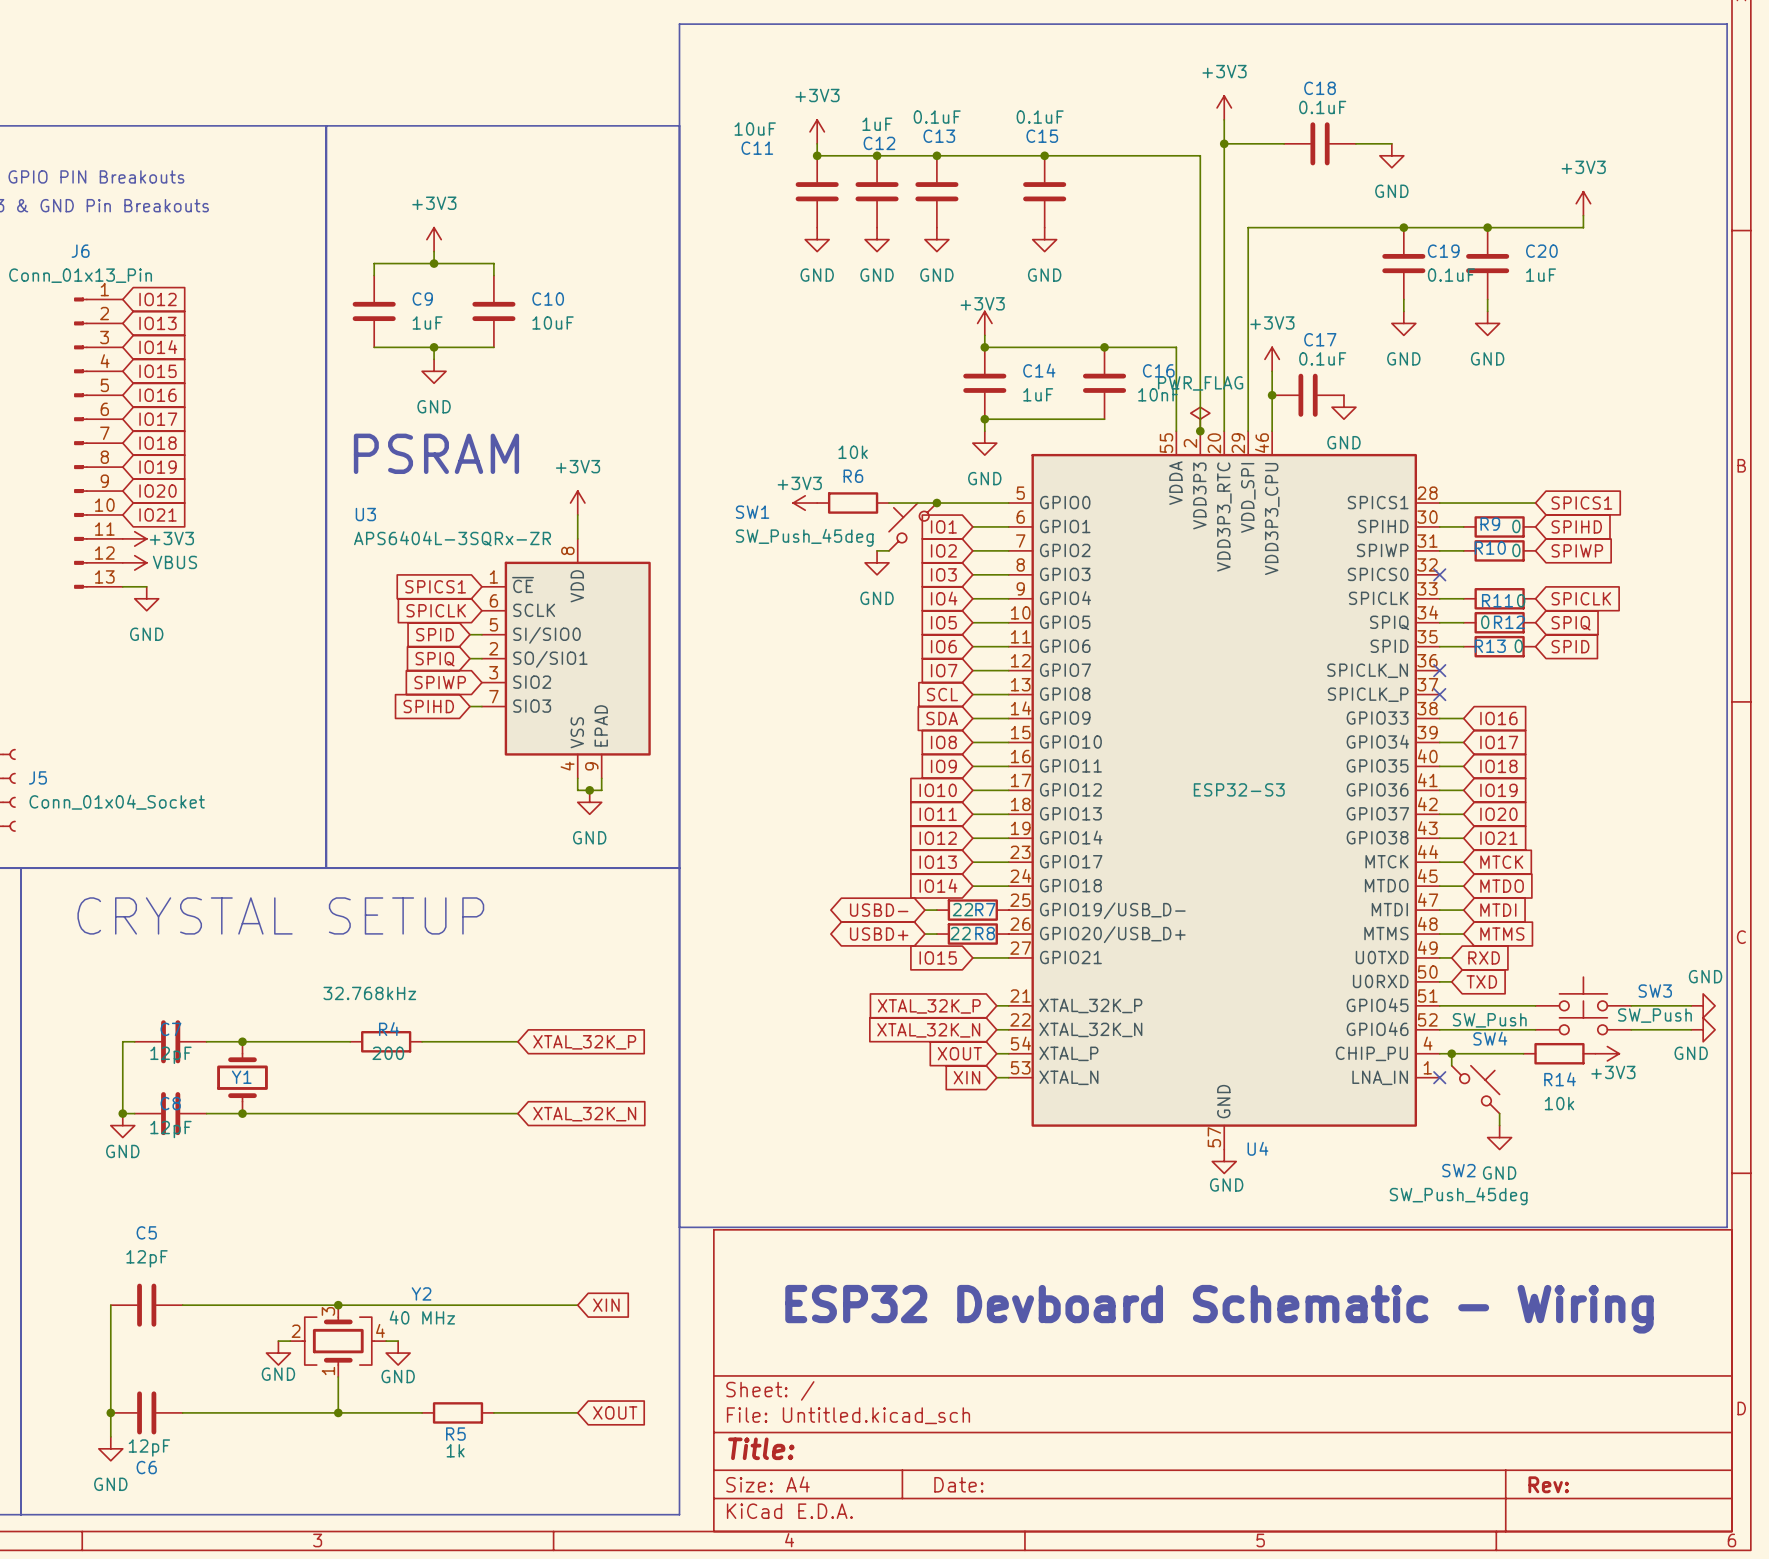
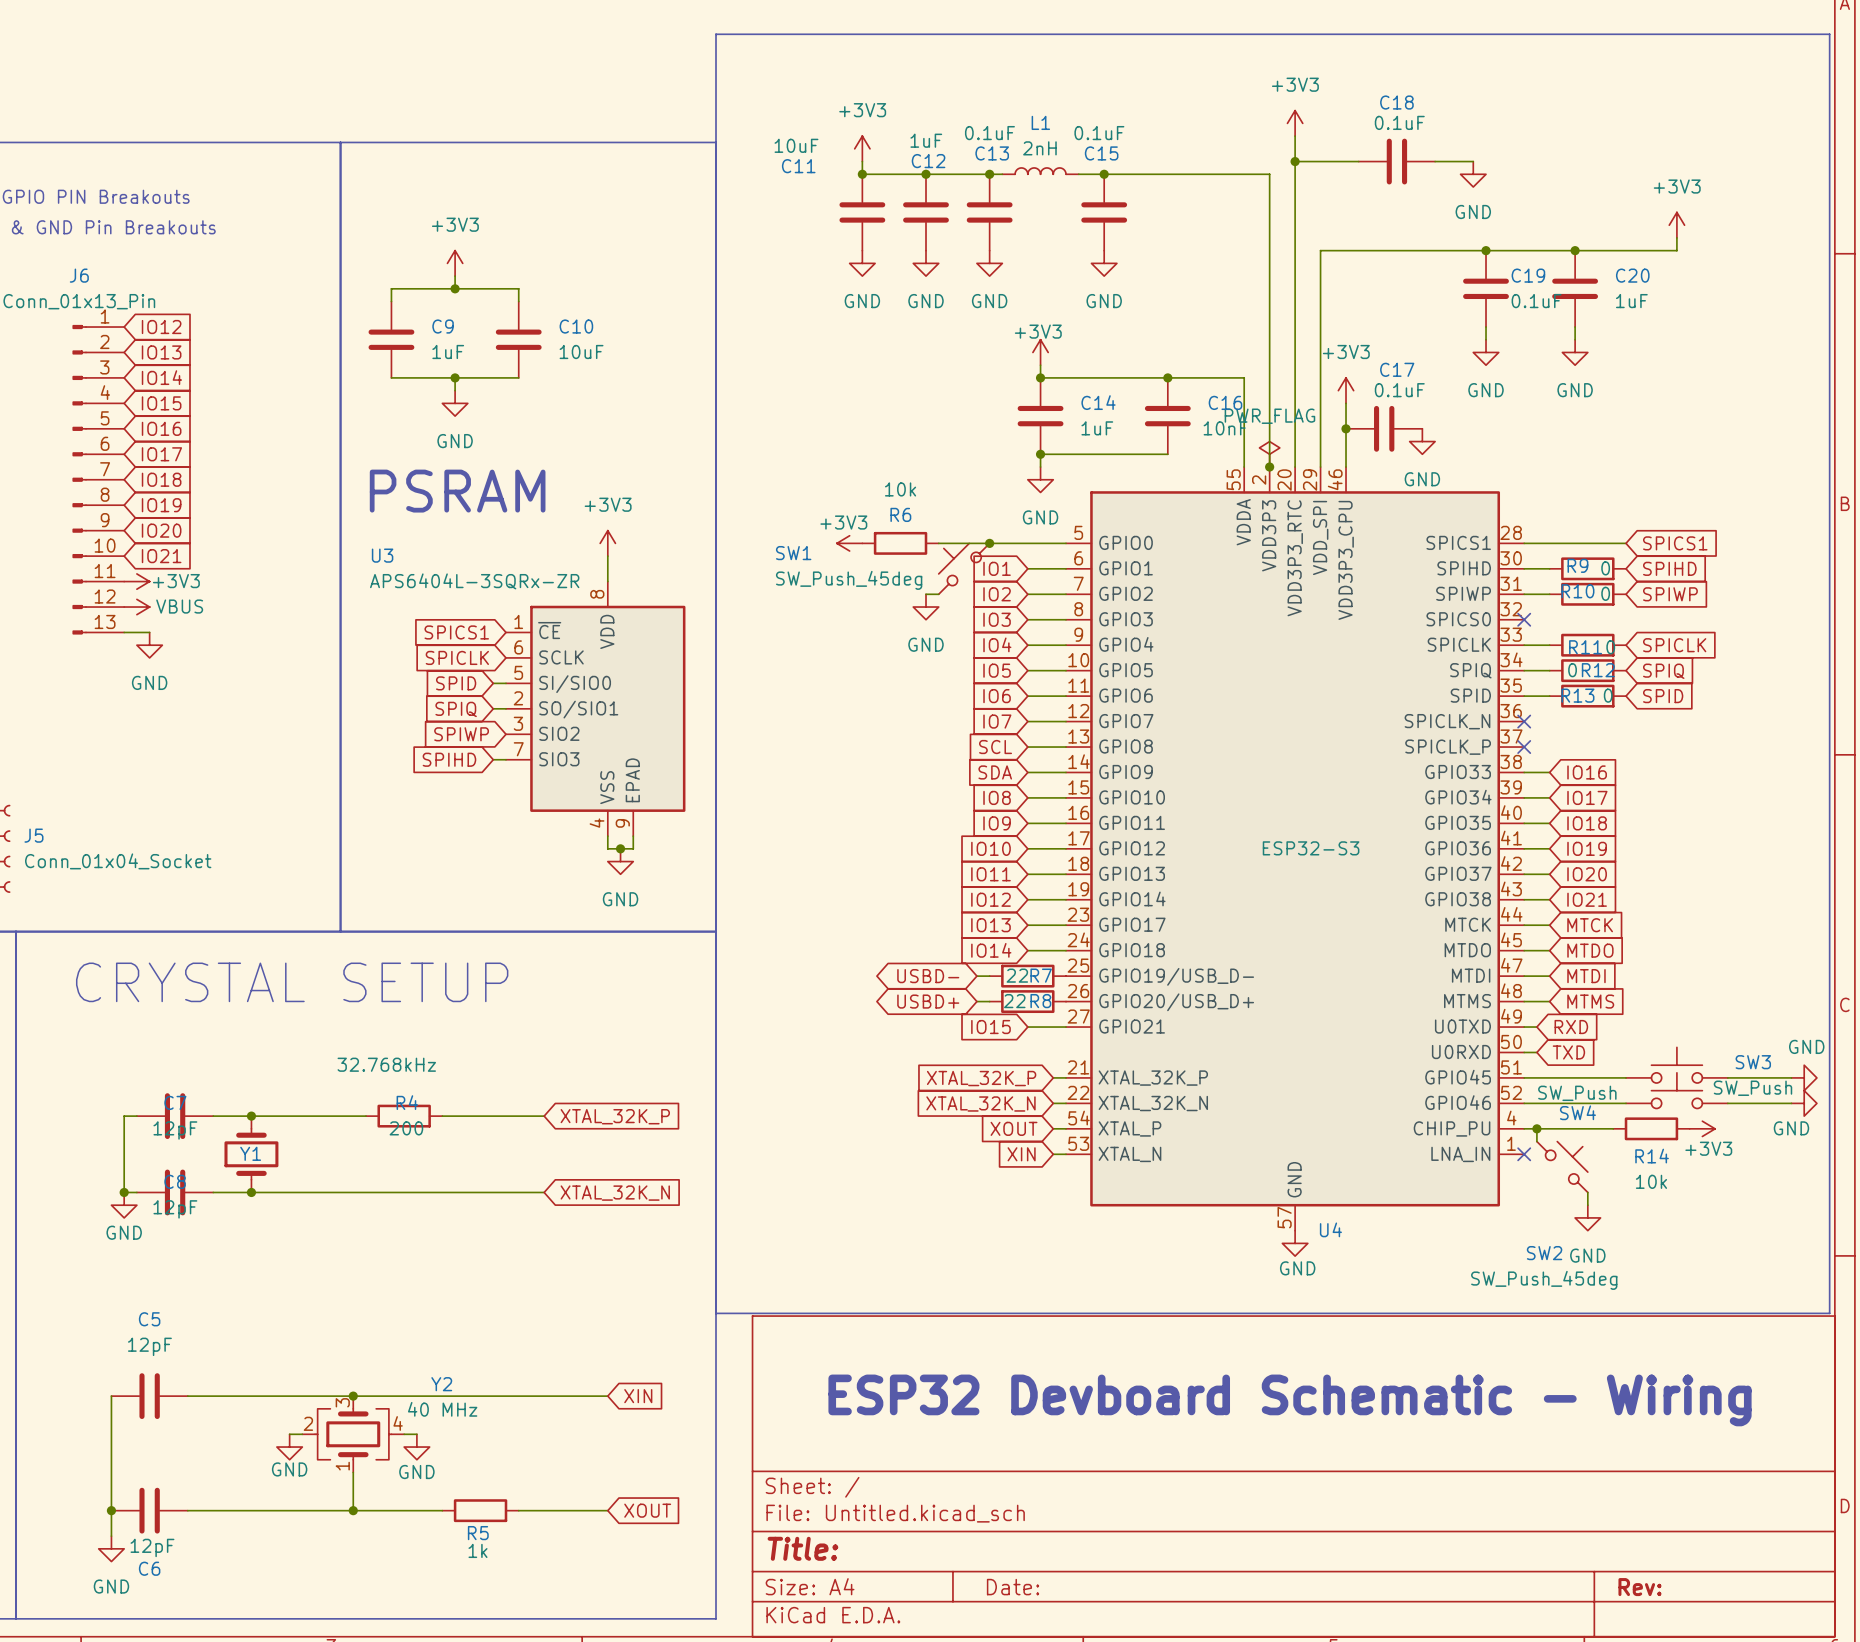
L1: none -> 2nH (1040, 171)
wire: (948, 155) (1020, 155) -> none

